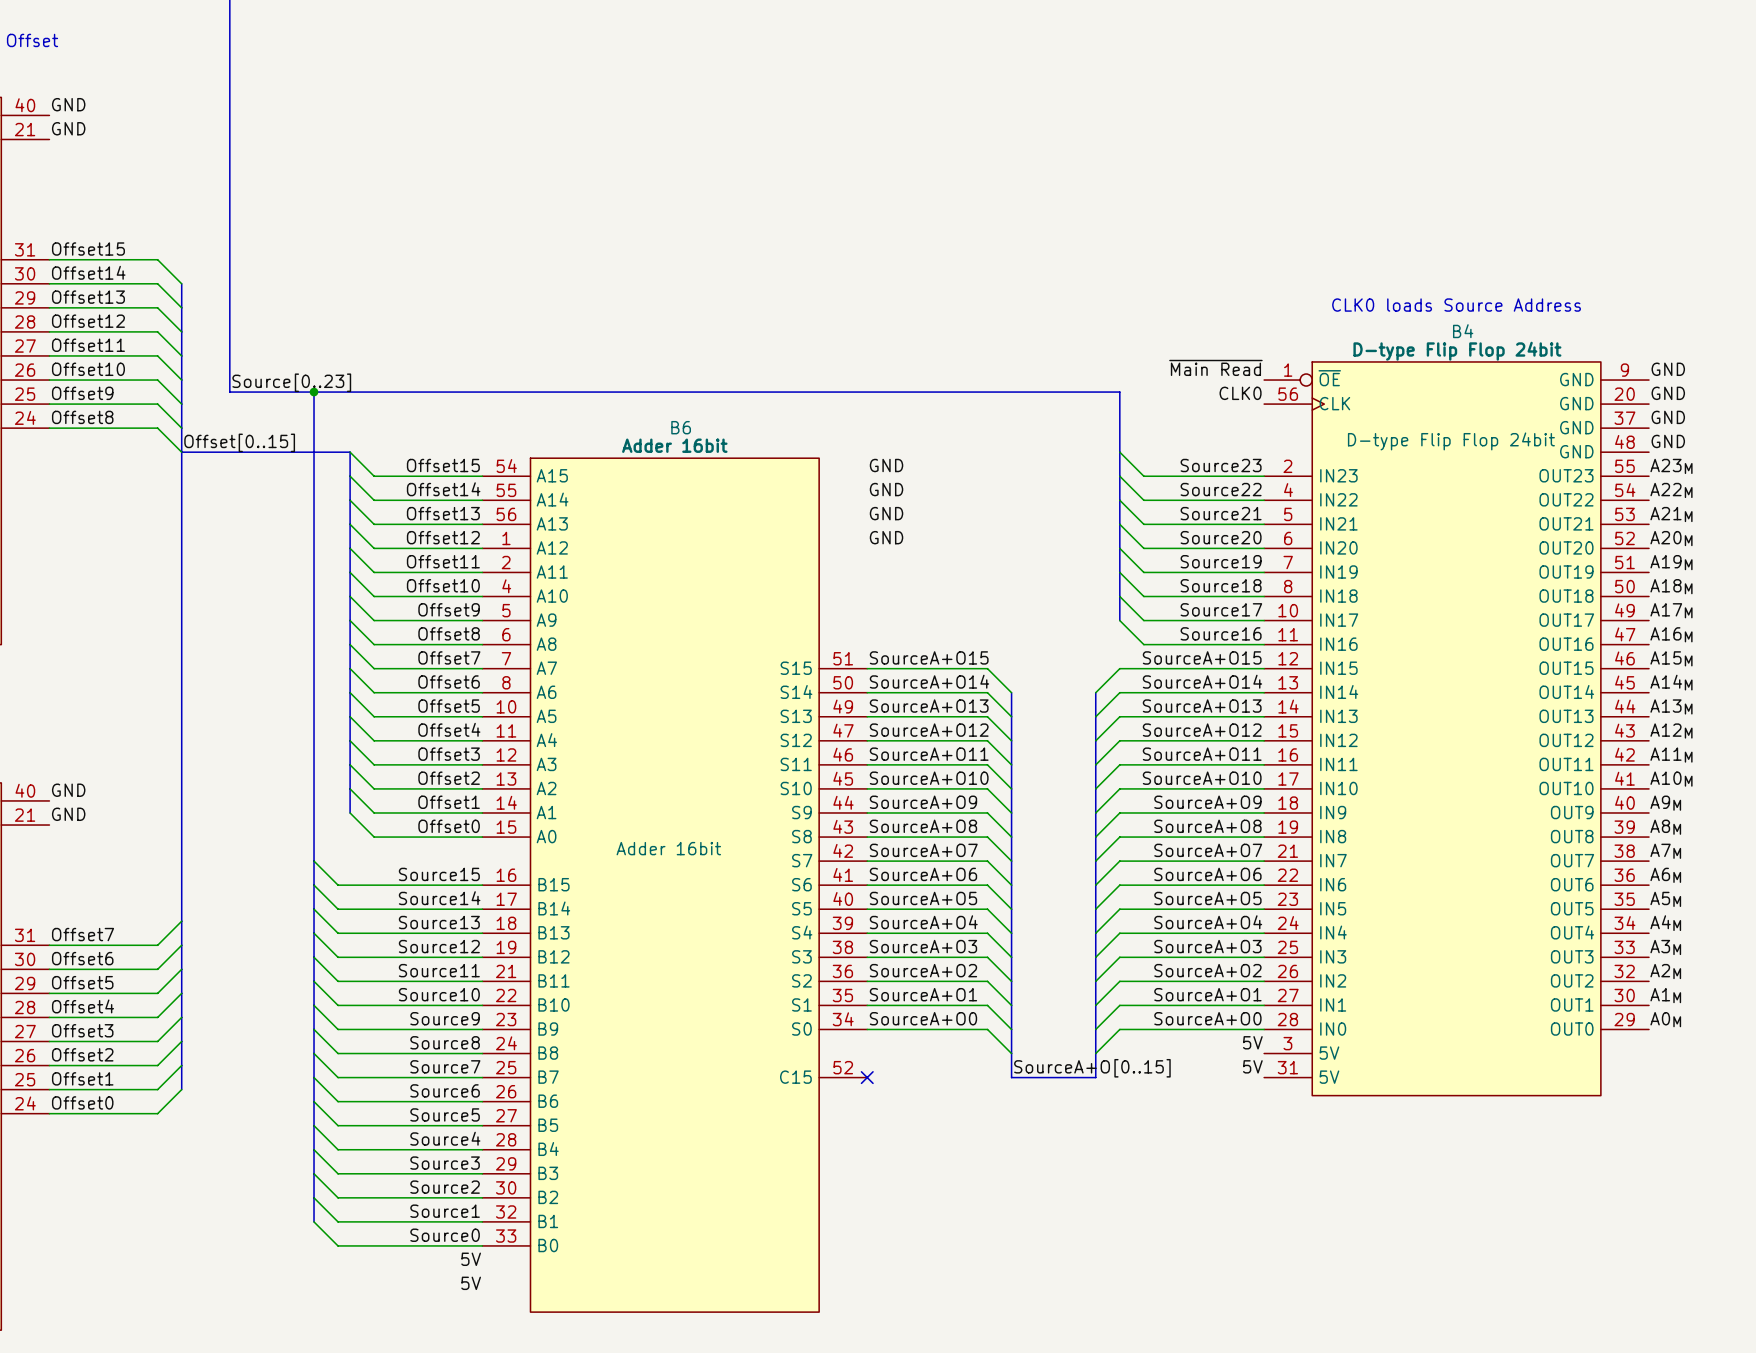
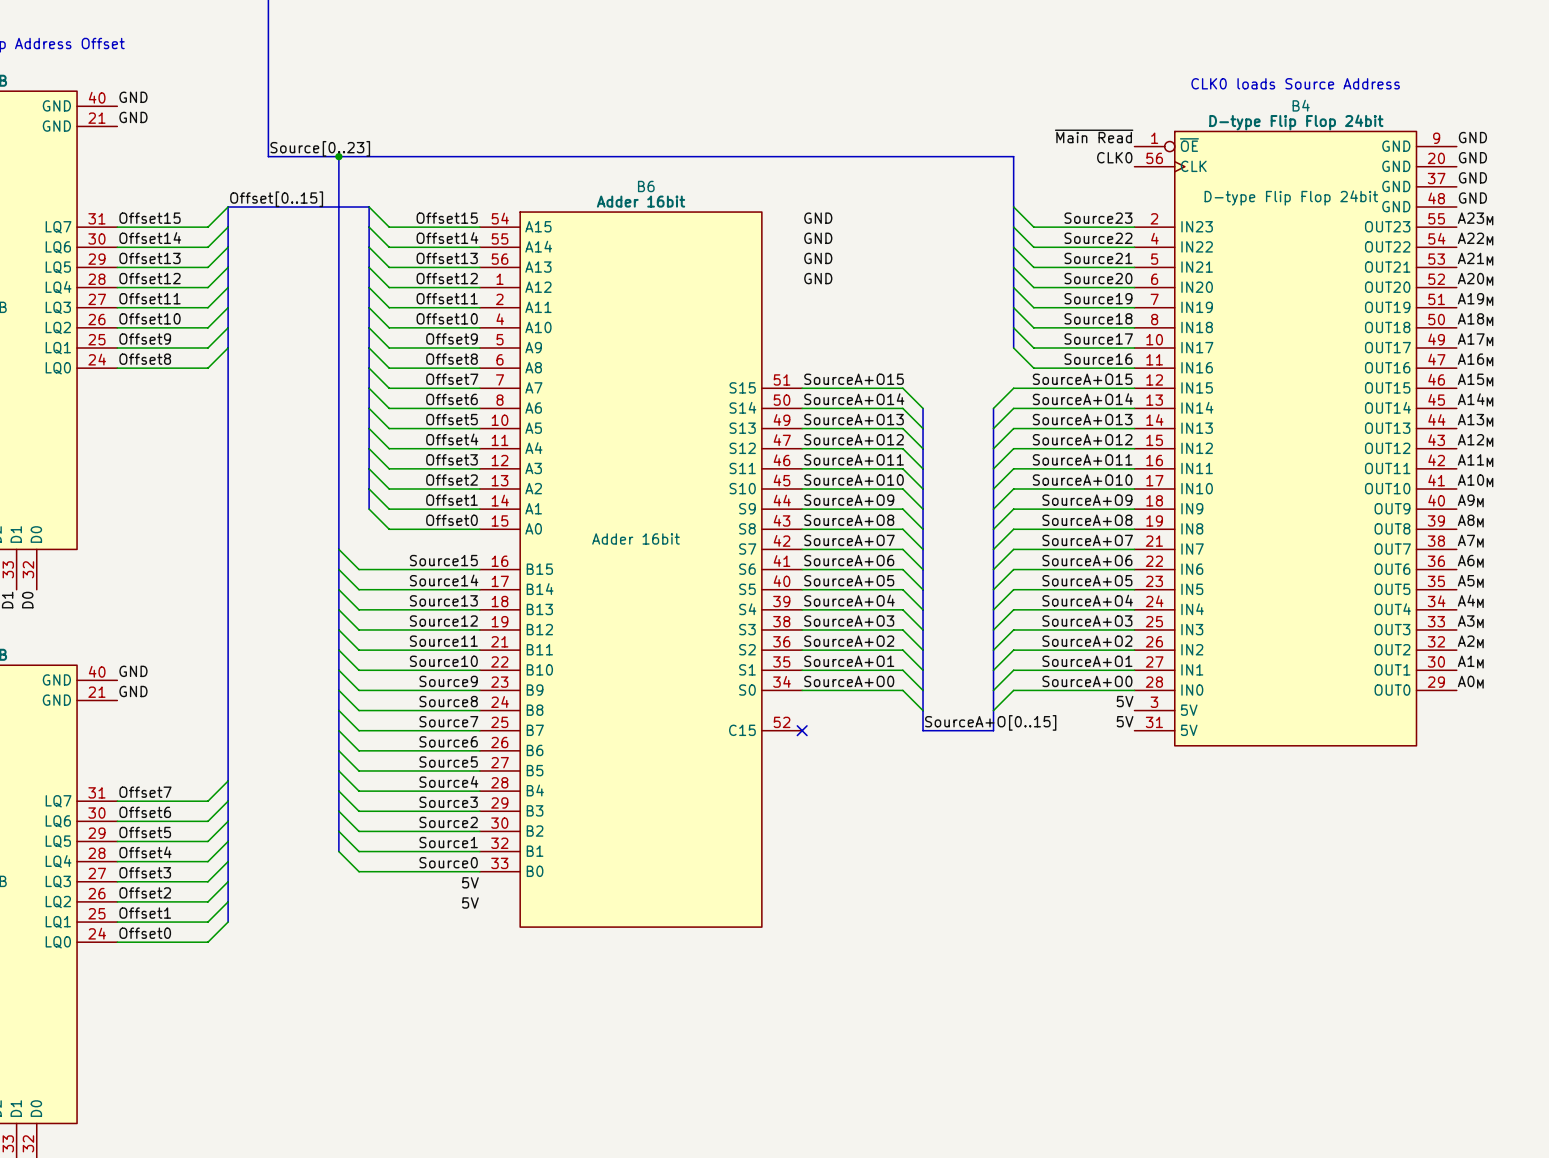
label: none -> ~{Main Read} (1094, 136)
label: none -> GND (1472, 137)
bus: (229, 175) (229, 392) (1119, 392) -> (268, 156) (1013, 156) (1013, 337)
bus: none -> (338, 156) (338, 337)
junction: none -> (338, 156)
label: none -> CLK0 (1114, 157)
label: none -> GND (1472, 157)
label: none -> GND (1472, 177)
label: none -> GND (1472, 198)
wire: none -> (369, 207) (389, 227) (479, 227)
wire: none -> (1013, 207) (1033, 227) (1134, 227)
label: none -> Offset15 (447, 218)
label: none -> GND (818, 218)
label: none -> Source23 (1098, 218)
label: none -> A23M (1475, 218)
wire: (157, 259) (181, 283) -> (207, 227) (228, 207)
wire: none -> (369, 227) (389, 247) (479, 247)
wire: none -> (1013, 227) (1033, 247) (1134, 247)
label: none -> Offset14 (447, 238)
label: none -> GND (818, 238)
label: none -> Source22 (1098, 238)
label: none -> A22M (1475, 239)
wire: (157, 283) (181, 307) -> (207, 247) (228, 227)
wire: none -> (369, 247) (389, 267) (479, 267)
wire: none -> (1013, 247) (1033, 267) (1134, 267)
label: none -> Offset13 (447, 258)
label: none -> GND (818, 258)
label: none -> Source21 (1098, 258)
label: none -> A21M (1475, 259)
text position: CLK0 loads Source Address (1456, 305) -> CLK0 loads Source Address (1295, 83)
wire: (157, 307) (181, 331) -> (207, 267) (228, 247)
wire: none -> (369, 267) (389, 287) (479, 287)
wire: none -> (1013, 267) (1033, 287) (1134, 287)
label: none -> Offset12 (447, 278)
label: none -> GND (818, 278)
label: none -> Source20 (1098, 278)
label: none -> A20M (1475, 279)
wire: (157, 331) (181, 355) -> (207, 287) (228, 267)
wire: none -> (369, 287) (389, 307) (479, 307)
wire: none -> (1013, 287) (1033, 307) (1134, 307)
label: none -> Offset11 (447, 298)
label: none -> Source19 (1098, 298)
label: none -> A19M (1475, 299)
wire: (157, 355) (181, 380) -> (207, 307) (228, 287)
wire: none -> (369, 307) (389, 327) (479, 327)
wire: none -> (1013, 307) (1033, 327) (1134, 327)
label: ~{Main Read} (1215, 367) -> Source18 (1098, 318)
label: none -> Offset10 (447, 318)
label: GND (1668, 369) -> A18M (1475, 319)
wire: (157, 380) (181, 404) -> (207, 327) (228, 307)
wire: none -> (369, 327) (389, 348) (479, 348)
wire: none -> (1013, 327) (1033, 348) (1134, 348)
label position: Source[0..23] (291, 382) -> Source[0..23] (320, 148)
junction: (314, 392) -> none
label: none -> Offset9 (451, 339)
label: CLK0 (1240, 393) -> Source17 (1098, 339)
label: GND (1668, 393) -> A17M (1475, 339)
wire: (157, 404) (181, 428) -> (207, 348) (228, 327)
wire: none -> (1013, 348) (1033, 368) (1134, 368)
bus: (1119, 404) (1119, 620) -> (993, 408) (993, 589)
label: none -> Source16 (1098, 359)
label: GND (1668, 417) -> A16M (1475, 359)
wire: (157, 428) (181, 452) -> (207, 368) (228, 348)
wire: none -> (369, 368) (389, 388) (479, 388)
label: none -> Offset7 (452, 379)
label: none -> SourceA+O15 (854, 379)
label: none -> SourceA+O15 (1082, 379)
label: GND (1668, 441) -> A15M (1475, 380)
label position: Offset[0..15] (239, 442) -> Offset[0..15] (276, 199)
bus: (181, 452) (350, 452) -> (228, 247) (228, 207) (369, 207) (369, 388)
wire: none -> (802, 388) (902, 388) (923, 408)
wire: (1119, 452) (1143, 476) -> (993, 428) (1013, 408) (1033, 408)
wire: none -> (1134, 388) (1013, 388) (993, 408)
label: Offset15 (443, 465) -> Offset6 (451, 399)
label: GND (886, 465) -> SourceA+O14 (854, 399)
label: Source23 (1221, 465) -> SourceA+O14 (1082, 399)
label: A23M (1671, 466) -> A14M (1475, 399)
wire: none -> (802, 408) (902, 408) (923, 428)
bus: none -> (923, 408) (923, 589)
wire: (1119, 476) (1143, 500) -> (993, 448) (1013, 428) (1033, 428)
label: Offset14 (443, 489) -> Offset5 (451, 419)
label: GND (886, 489) -> SourceA+O13 (854, 419)
label: Source22 (1221, 489) -> SourceA+O13 (1082, 419)
label: A22M (1671, 490) -> A13M (1475, 420)
wire: none -> (802, 428) (902, 428) (923, 448)
wire: (1119, 500) (1143, 524) -> (993, 468) (1013, 448) (1033, 448)
label: Offset13 (443, 513) -> Offset4 (452, 439)
label: GND (886, 513) -> SourceA+O12 (854, 439)
label: Source21 (1221, 513) -> SourceA+O12 (1082, 439)
label: A21M (1671, 514) -> A12M (1475, 440)
wire: none -> (802, 448) (902, 448) (923, 468)
wire: (1119, 524) (1143, 548) -> (993, 488) (1013, 468) (1033, 468)
label: Offset12 (443, 537) -> Offset3 (451, 459)
label: GND (886, 537) -> SourceA+O11 (854, 459)
label: Source20 (1221, 537) -> SourceA+O11 (1082, 459)
label: A20M (1671, 538) -> A11M (1475, 460)
wire: none -> (802, 468) (902, 468) (923, 488)
wire: (1119, 548) (1143, 572) -> (993, 509) (1013, 488) (1033, 488)
label: Offset11 (443, 561) -> Offset2 (451, 480)
label: none -> SourceA+O10 (854, 480)
label: Source19 (1221, 561) -> SourceA+O10 (1082, 480)
label: A19M (1671, 562) -> A10M (1475, 480)
wire: none -> (802, 488) (902, 488) (923, 509)
wire: (1119, 572) (1143, 596) -> (993, 529) (1013, 509) (1033, 509)
label: Offset10 (443, 585) -> Offset1 (451, 500)
label: none -> SourceA+O9 (849, 500)
label: Source18 (1221, 585) -> SourceA+O9 (1087, 500)
label: A18M (1671, 586) -> A9M (1470, 500)
bus: (350, 596) (350, 812) -> none
wire: none -> (802, 509) (902, 509) (923, 529)
wire: (1119, 596) (1143, 620) -> (993, 549) (1013, 529) (1033, 529)
label: Offset9 (449, 609) -> Offset0 (451, 520)
label: Source17 (1221, 609) -> SourceA+O8 (1087, 520)
label: A17M (1671, 610) -> A8M (1470, 521)
wire: (350, 620) (374, 644) (482, 644) -> (369, 348) (389, 368) (479, 368)
wire: (1119, 620) (1143, 644) -> (993, 569) (1013, 549) (1033, 549)
label position: Offset8 (449, 633) -> Offset8 (451, 359)
label: Source16 (1221, 633) -> SourceA+O7 (1087, 540)
label: A16M (1671, 634) -> A7M (1470, 541)
wire: (350, 644) (374, 668) -> (338, 549) (359, 569) (389, 569)
label: Offset7 (449, 657) -> Source15 (443, 560)
label: SourceA+O15 (929, 657) -> SourceA+O6 (849, 560)
label: SourceA+O15 (1202, 657) -> SourceA+O6 (1087, 560)
label: A15M (1671, 658) -> A6M (1470, 561)
wire: (350, 668) (374, 692) -> (338, 569) (359, 589) (389, 589)
label: Offset6 (449, 681) -> Source14 (444, 580)
label: SourceA+O14 (929, 681) -> SourceA+O5 (849, 580)
label: SourceA+O14 (1202, 681) -> SourceA+O5 (1087, 580)
label: A14M (1671, 682) -> A5M (1470, 581)
wire: (350, 692) (374, 716) -> (338, 589) (359, 609) (389, 609)
label: Offset5 (449, 706) -> Source13 (443, 600)
label: SourceA+O13 (929, 706) -> SourceA+O4 (849, 600)
label: SourceA+O13 (1202, 706) -> SourceA+O4 (1087, 600)
label: A13M (1671, 706) -> A4M (1470, 601)
wire: (350, 716) (374, 740) -> (338, 609) (359, 629) (389, 629)
B4 position: (1456, 728) -> (1295, 438)
label: Offset4 (449, 729) -> Source12 (443, 621)
label: SourceA+O12 (929, 730) -> SourceA+O3 (849, 621)
label: SourceA+O12 (1202, 730) -> SourceA+O3 (1087, 621)
label: A12M (1671, 731) -> A3M (1470, 621)
wire: (350, 740) (374, 764) -> (338, 629) (359, 650) (389, 650)
label: Offset3 (449, 754) -> Source11 (443, 641)
label: SourceA+O11 (929, 754) -> SourceA+O2 (849, 641)
label: SourceA+O11 (1202, 754) -> SourceA+O2 (1087, 641)
label: A11M (1671, 755) -> A2M (1470, 641)
wire: (350, 764) (374, 788) -> (338, 650) (359, 670) (389, 670)
label: Offset2 (449, 778) -> Source10 (443, 661)
label: SourceA+O10 (929, 778) -> SourceA+O1 (849, 661)
label: SourceA+O10 (1202, 778) -> SourceA+O1 (1087, 661)
label: A10M (1671, 779) -> A1M (1470, 662)
wire: (350, 788) (374, 812) -> (338, 670) (359, 690) (389, 690)
label: Offset1 (449, 802) -> Source9 (448, 681)
label: SourceA+O9 (923, 802) -> SourceA+O0 (849, 681)
label: SourceA+O9 (1207, 802) -> SourceA+O0 (1087, 681)
label: A9M (1665, 803) -> A0M (1470, 682)
wire: (350, 812) (374, 837) -> (338, 690) (359, 710) (389, 710)
label: Offset0 (449, 826) -> Source8 (448, 701)
label position: SourceA+O8 (923, 826) -> SourceA+O8 (849, 520)
label: SourceA+O8 (1207, 826) -> 5V (1125, 701)
label: A8M (1665, 827) -> none
wire: (867, 837) (987, 837) (1011, 861) -> (802, 529) (902, 529) (923, 549)
wire: (1264, 837) (1119, 837) (1095, 861) -> none
label: none -> Source7 (448, 721)
label position: SourceA+O7 (923, 850) -> SourceA+O7 (849, 540)
label: SourceA+O7 (1208, 850) -> 5V (1125, 721)
label: A7M (1665, 851) -> none
wire: (867, 861) (987, 861) (1011, 885) -> (802, 549) (902, 549) (923, 569)
no-connect mark: none -> (802, 730)
bus: (1011, 861) (1011, 1077) (1095, 1077) (1095, 861) -> (923, 730) (993, 730)
wire: (1264, 861) (1119, 861) (1095, 885) -> none
label: Source15 (439, 874) -> Source6 (448, 741)
label: SourceA+O6 (923, 874) -> none
label: SourceA+O6 (1207, 874) -> none
label: A6M (1665, 875) -> none
B6 position: (674, 885) -> (641, 569)
wire: (867, 885) (987, 885) (1011, 909) -> none
wire: (1264, 885) (1119, 885) (1095, 909) -> none
label: Source14 (439, 898) -> Source5 (448, 761)
label: SourceA+O5 (923, 898) -> none
label: SourceA+O5 (1207, 898) -> none
label: A5M (1665, 899) -> none
wire: (867, 909) (987, 909) (1011, 933) -> none
wire: (1264, 909) (1119, 909) (1095, 933) -> none
label: Source13 (439, 922) -> Source4 (448, 781)
label: SourceA+O4 (923, 922) -> none
label: SourceA+O4 (1208, 922) -> none
label: A4M (1665, 923) -> none
wire: (867, 933) (987, 933) (1011, 957) -> none
wire: (1264, 933) (1119, 933) (1095, 957) -> none
label: Source12 (439, 946) -> Source3 (448, 802)
label: SourceA+O3 (923, 946) -> none
label: SourceA+O3 (1207, 946) -> none
label: A3M (1665, 947) -> none
wire: (867, 957) (987, 957) (1011, 981) -> none
wire: (1264, 957) (1119, 957) (1095, 981) -> none
label: Source11 (439, 970) -> Source2 (448, 822)
label: SourceA+O2 (923, 970) -> none
label: SourceA+O2 (1207, 970) -> none
label: A2M (1665, 971) -> none
wire: (867, 981) (987, 981) (1011, 1005) -> none
wire: (1264, 981) (1119, 981) (1095, 1005) -> none
label: Source10 (439, 994) -> Source1 (448, 842)
label: SourceA+O1 (923, 994) -> none
label: SourceA+O1 (1207, 994) -> none
label: A1M (1665, 995) -> none
bus: (314, 1005) (314, 1221) -> none
wire: (867, 1005) (987, 1005) (1011, 1029) -> none
wire: (1264, 1005) (1119, 1005) (1095, 1029) -> none
label: Source9 (445, 1018) -> Source0 (448, 862)
label: SourceA+O0 (923, 1018) -> none
label: SourceA+O0 (1207, 1018) -> none
label: A0M (1665, 1019) -> none
wire: (314, 1029) (338, 1053) (482, 1053) -> none
wire: (867, 1029) (987, 1029) (1011, 1053) -> none
wire: (1264, 1029) (1119, 1029) (1095, 1053) -> none
label: Source8 (445, 1042) -> 5V (470, 882)
label: 5V (1252, 1042) -> none
wire: (314, 1053) (338, 1077) (482, 1077) -> (338, 710) (359, 730) (479, 730)
label: Source7 (445, 1066) -> 5V (470, 902)
label: 5V (1252, 1066) -> none
label position: SourceA+O[0..15] (1092, 1068) -> SourceA+O[0..15] (990, 722)
wire: (314, 1077) (338, 1101) (482, 1101) -> none
no-connect mark: (867, 1077) -> none
label: Source6 (445, 1090) -> none
wire: (314, 1101) (338, 1125) (482, 1125) -> none
label: Source5 (445, 1114) -> none
wire: (314, 1125) (338, 1149) (482, 1149) -> none
label: Source4 (445, 1138) -> none
wire: (314, 1149) (338, 1173) (482, 1173) -> none
label: Source3 (445, 1163) -> none
wire: (314, 1173) (338, 1197) (482, 1197) -> none
label: Source2 (445, 1187) -> none
wire: (314, 1197) (338, 1221) (482, 1221) -> none
label: Source1 (445, 1211) -> none
wire: (314, 1221) (338, 1245) (482, 1245) -> none
label: Source0 (445, 1235) -> none
label: 5V (471, 1259) -> none
label: 5V (471, 1283) -> none

